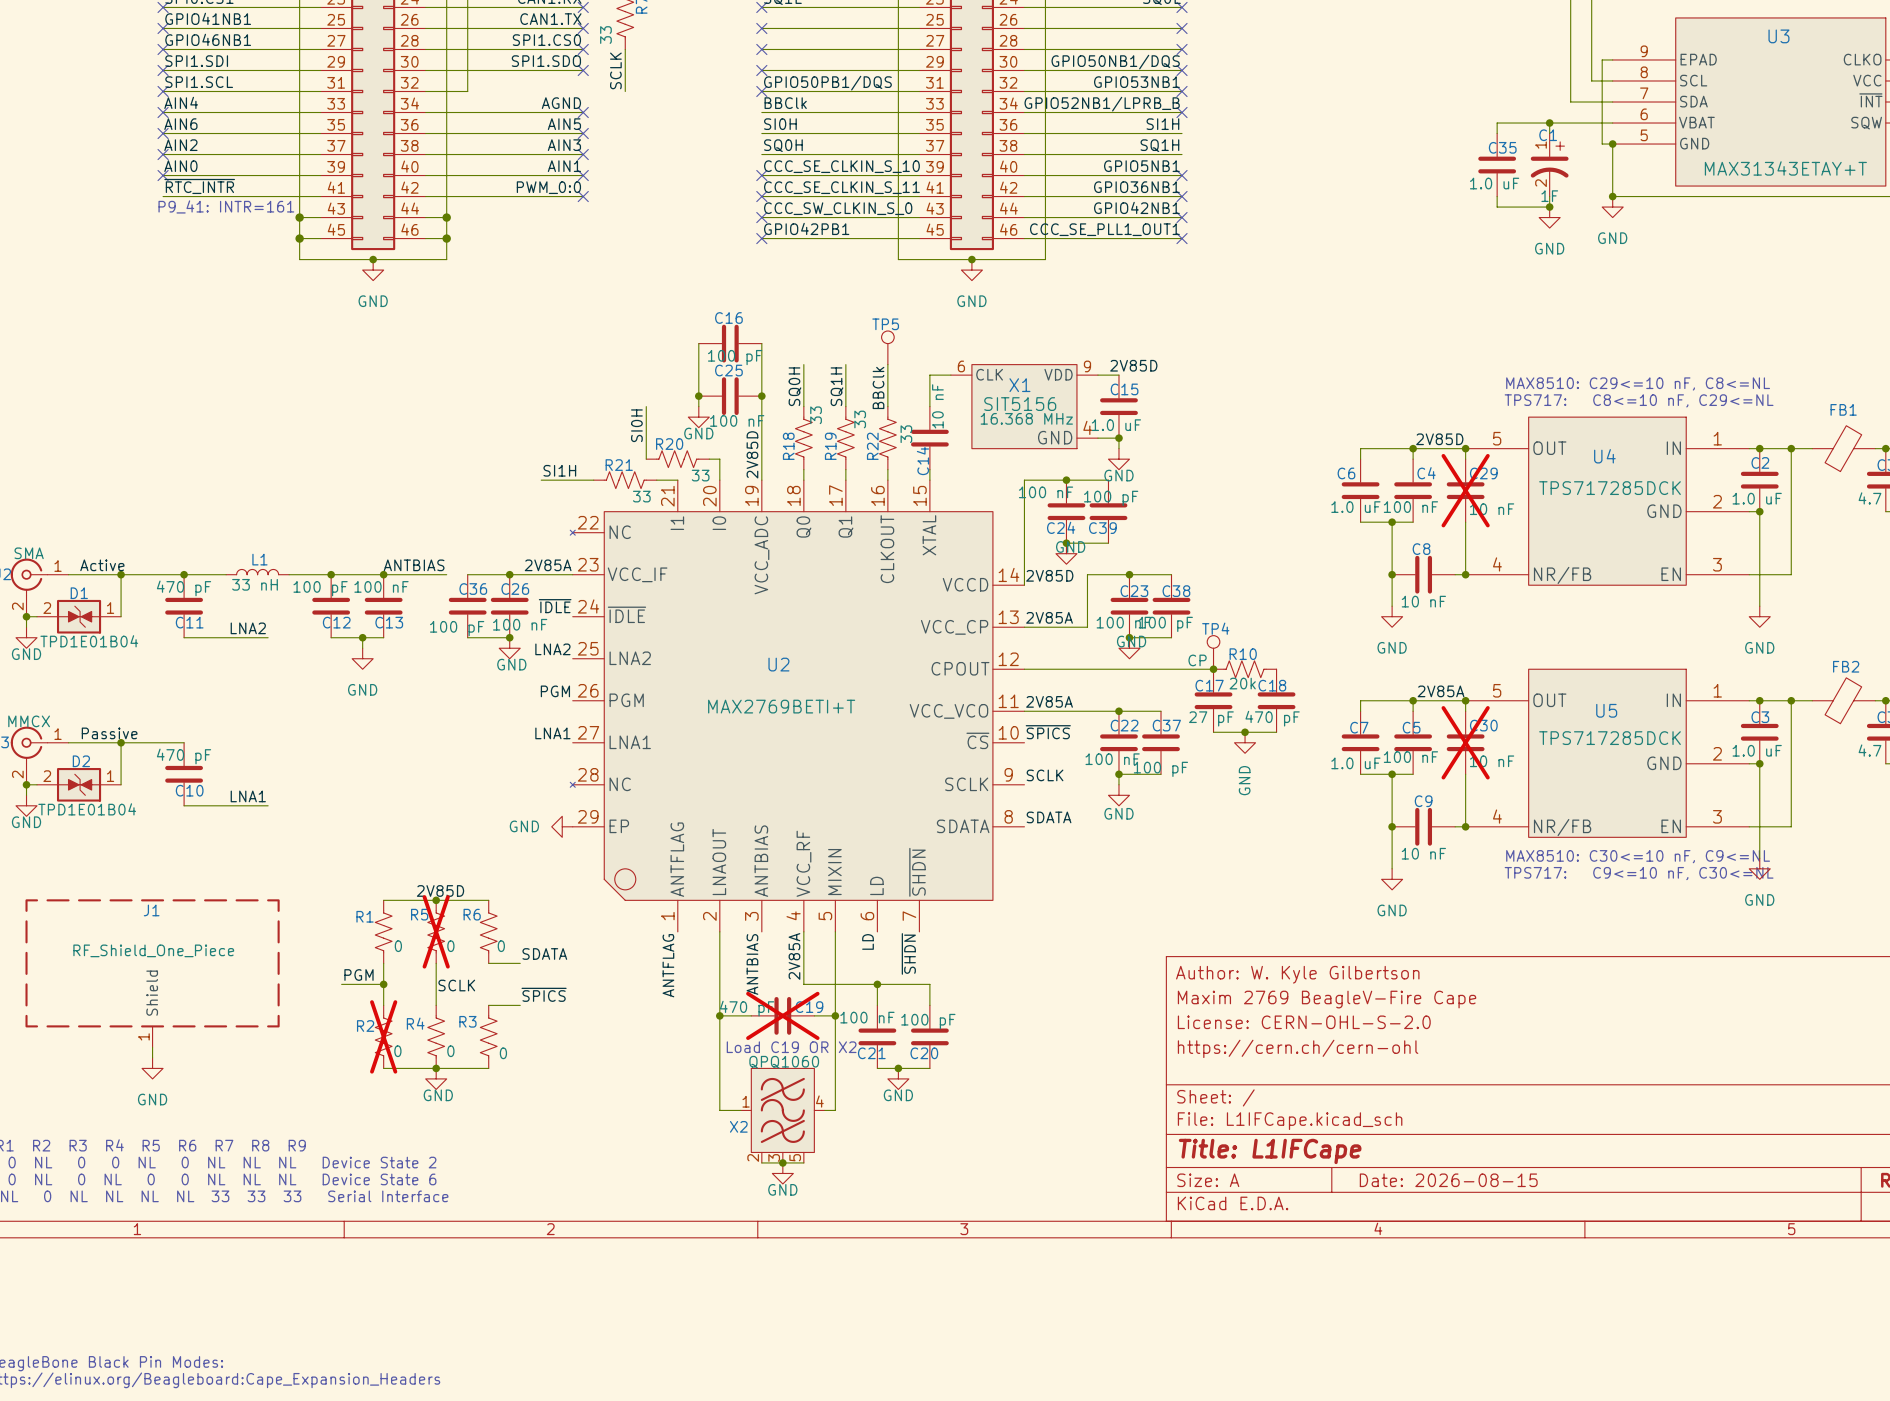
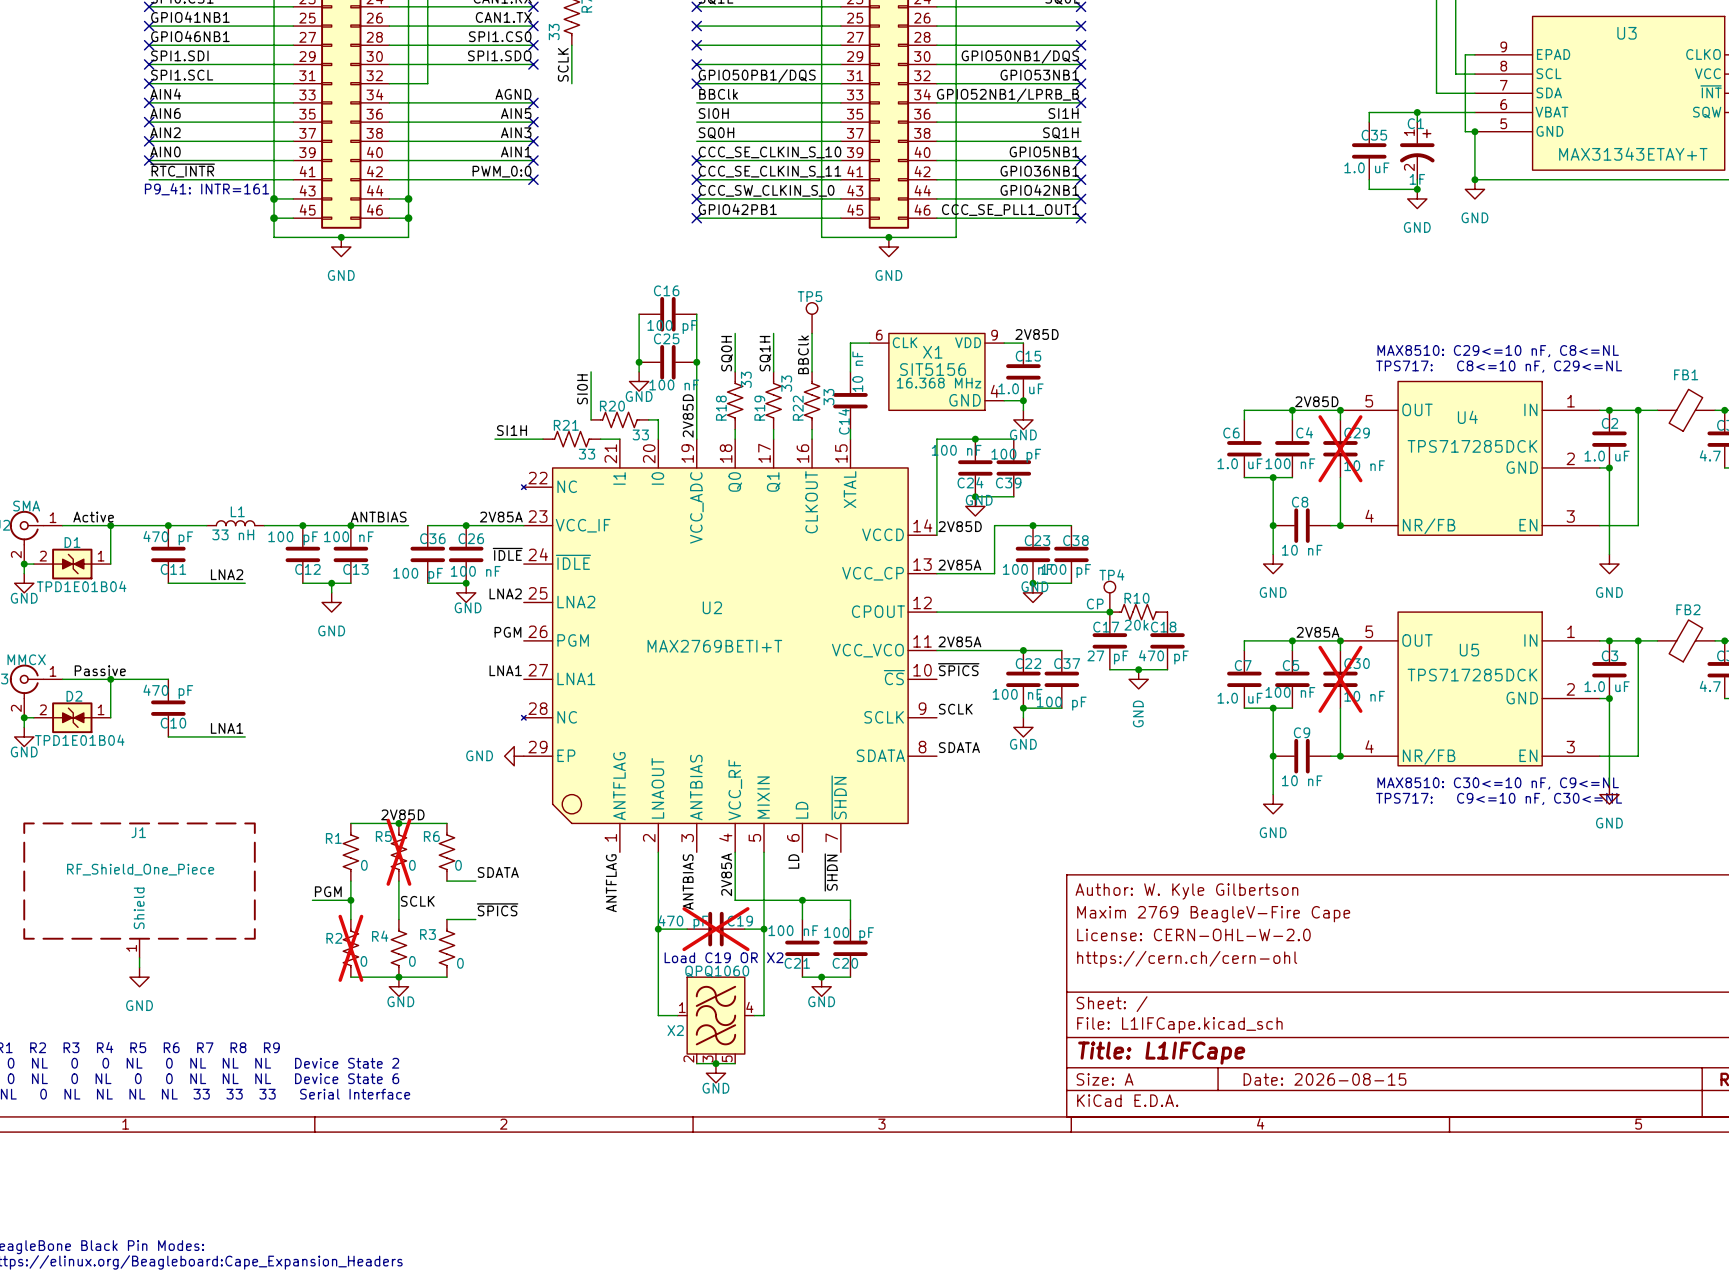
title block: License: CERN-OHL-S-2.0 (1304, 1022) -> License: CERN-OHL-W-2.0 (1193, 934)

